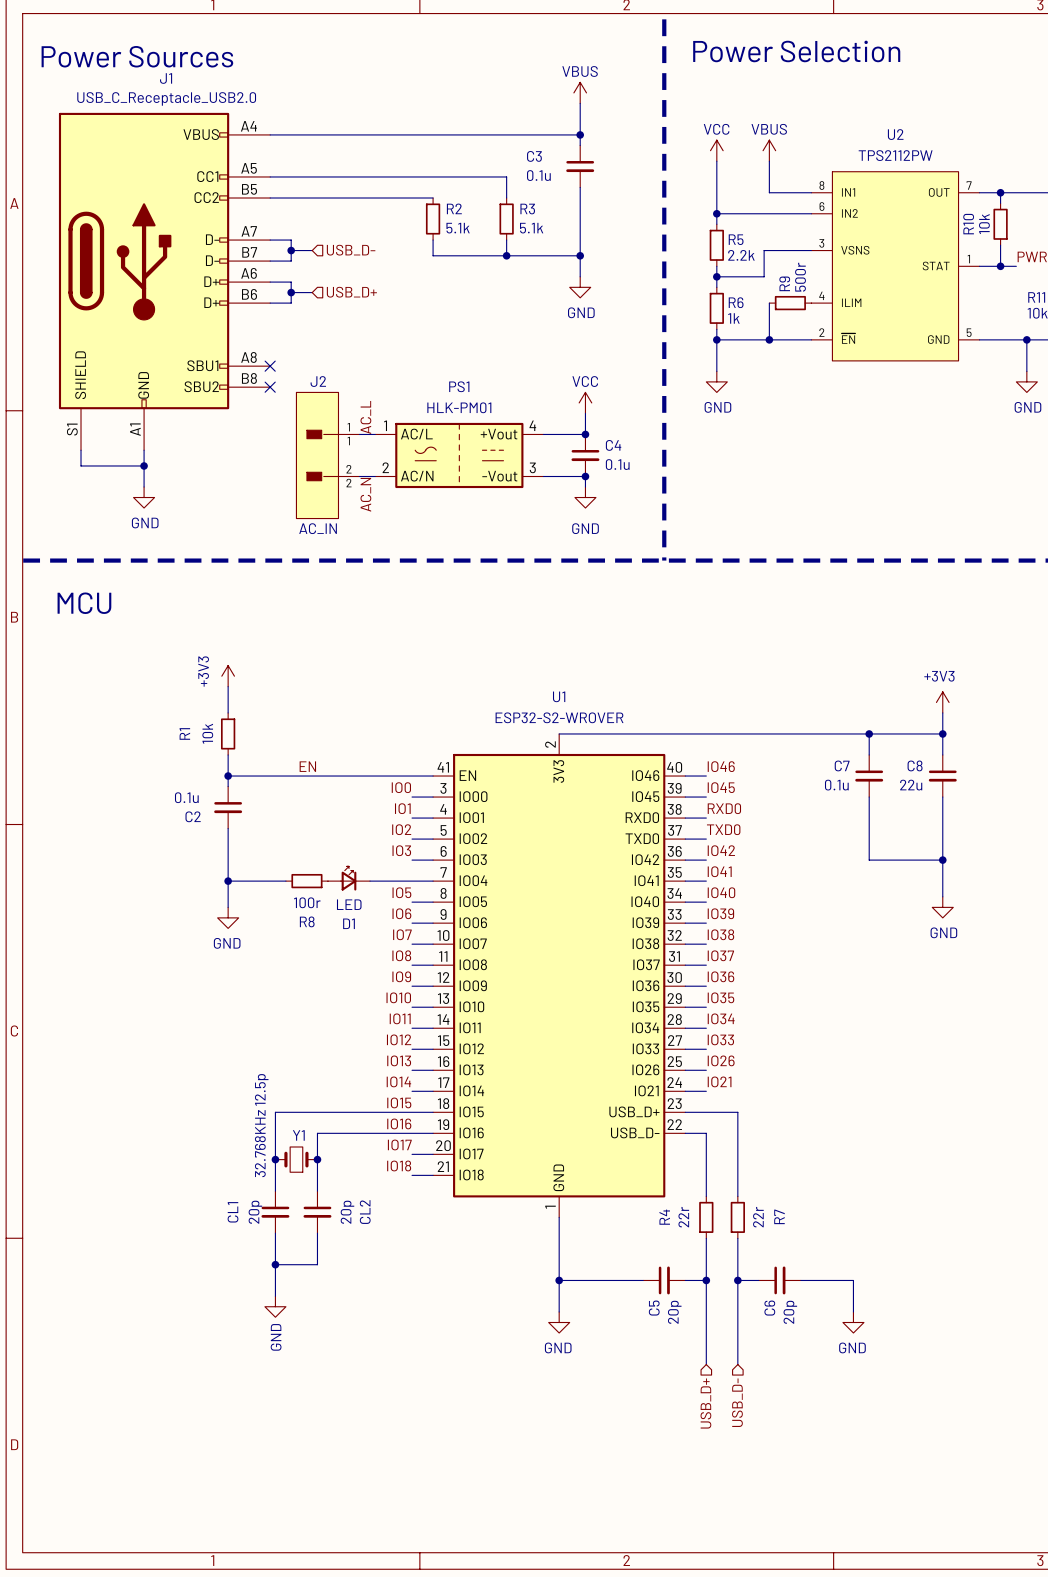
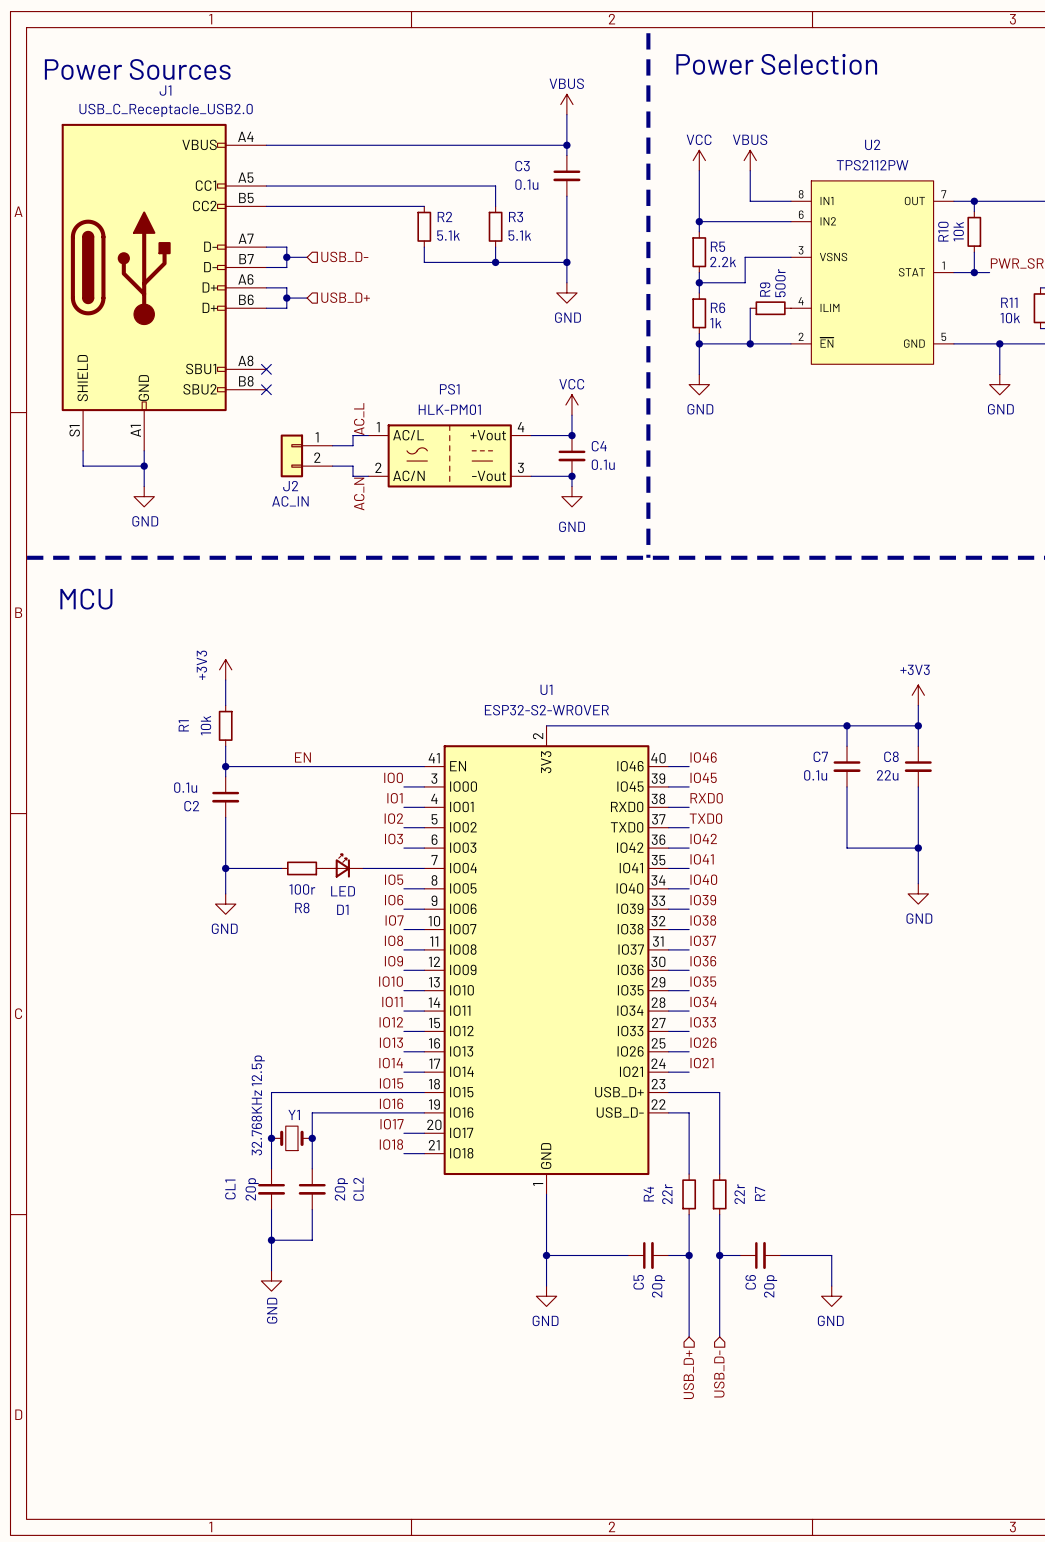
J2 name position: J2 (318, 381) -> J2 (290, 486)
J2 symbol: [296, 392, 360, 519] -> [280, 434, 333, 478]
wire: none -> (353, 435) (353, 445) (332, 445)
wire: none -> (332, 466) (353, 466) (353, 476)
J2 value position: AC_IN (318, 528) -> AC_IN (290, 501)

